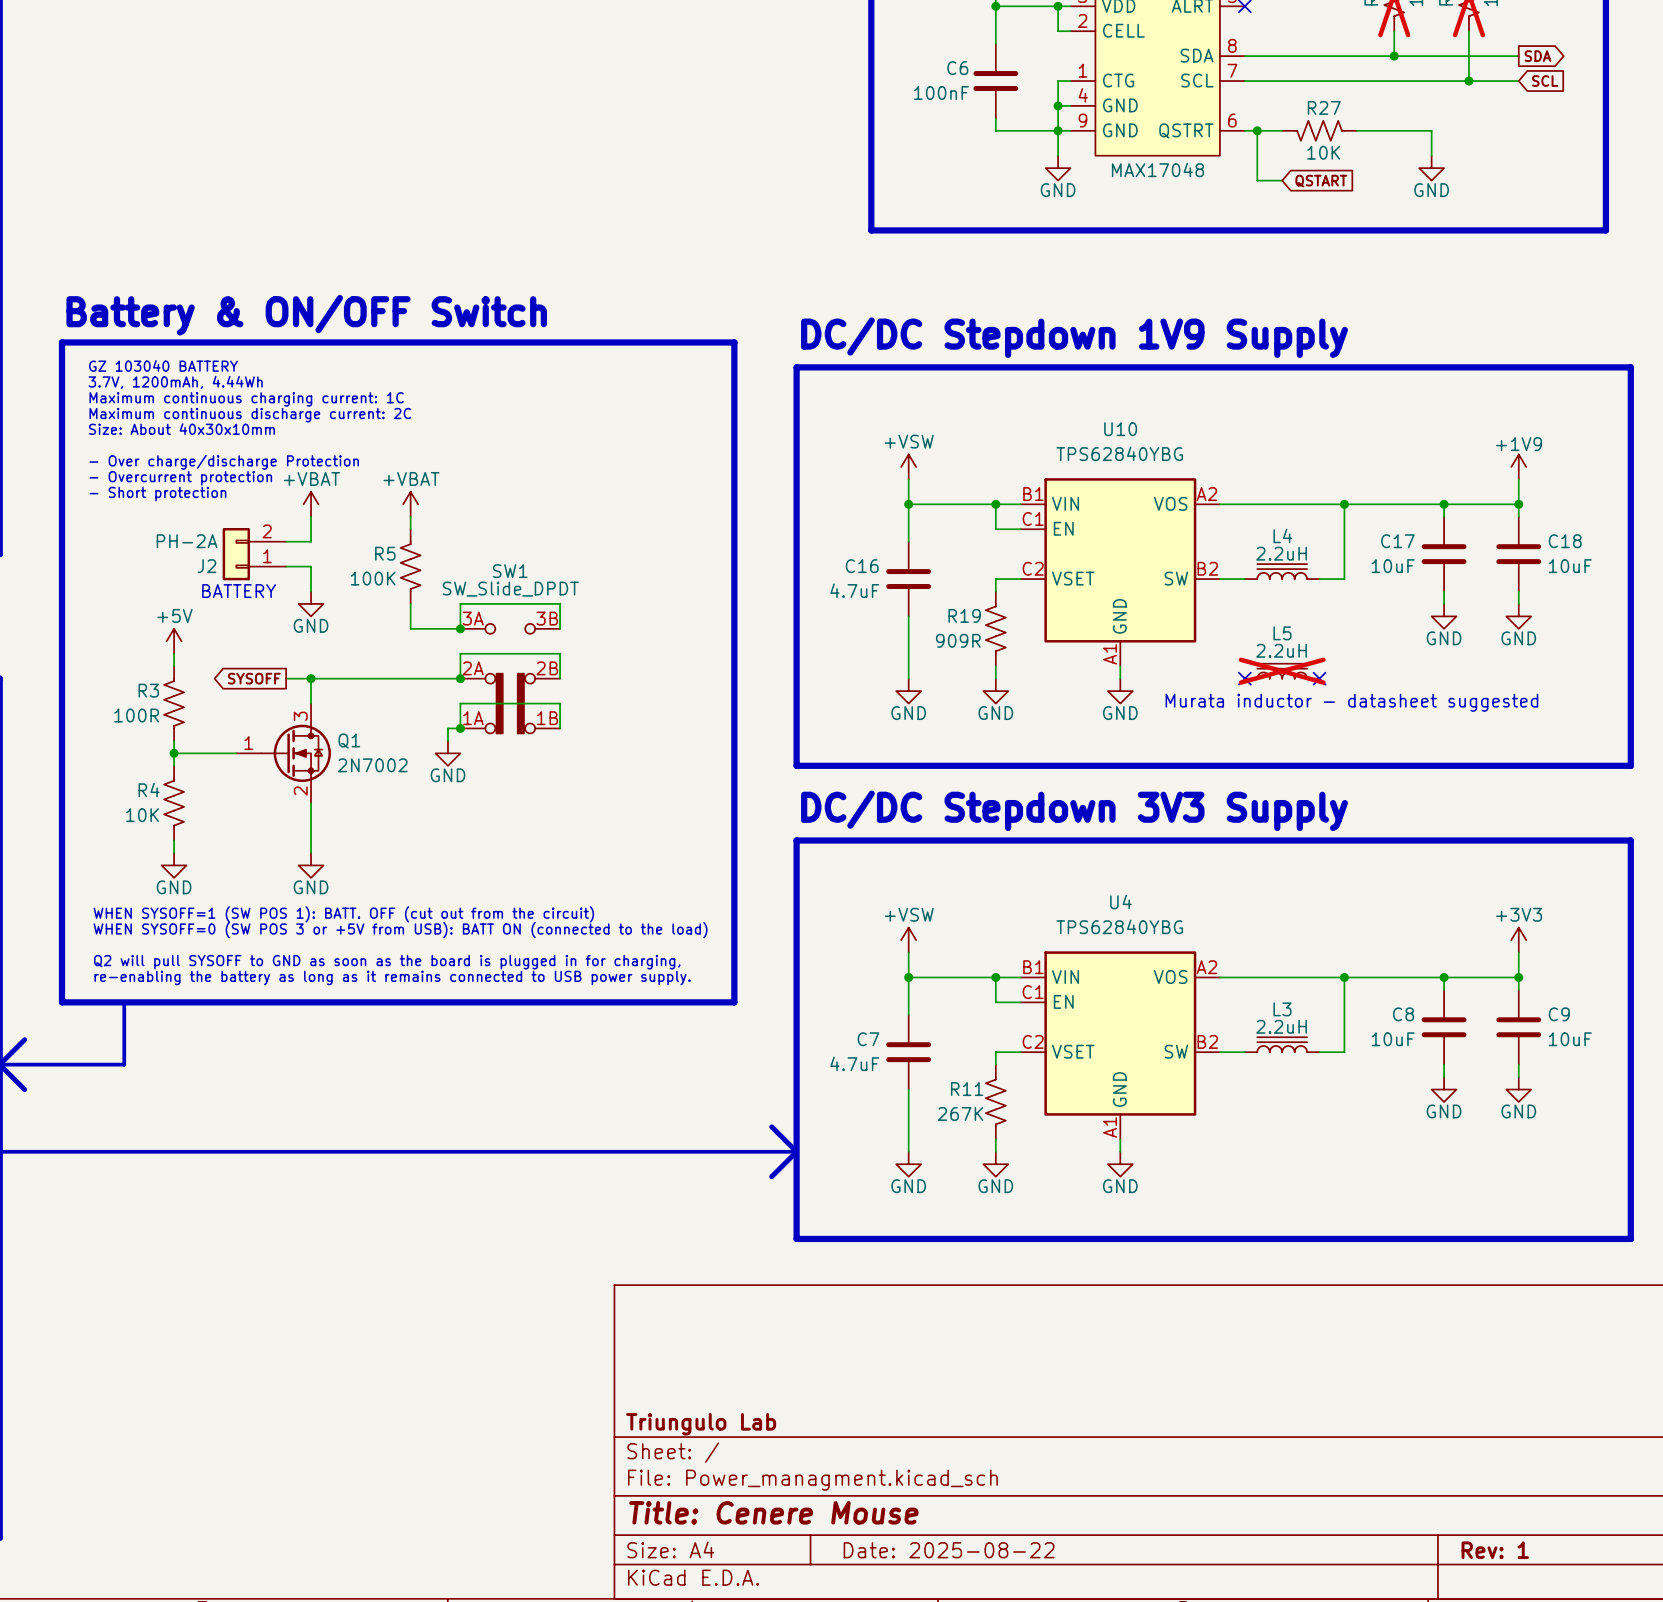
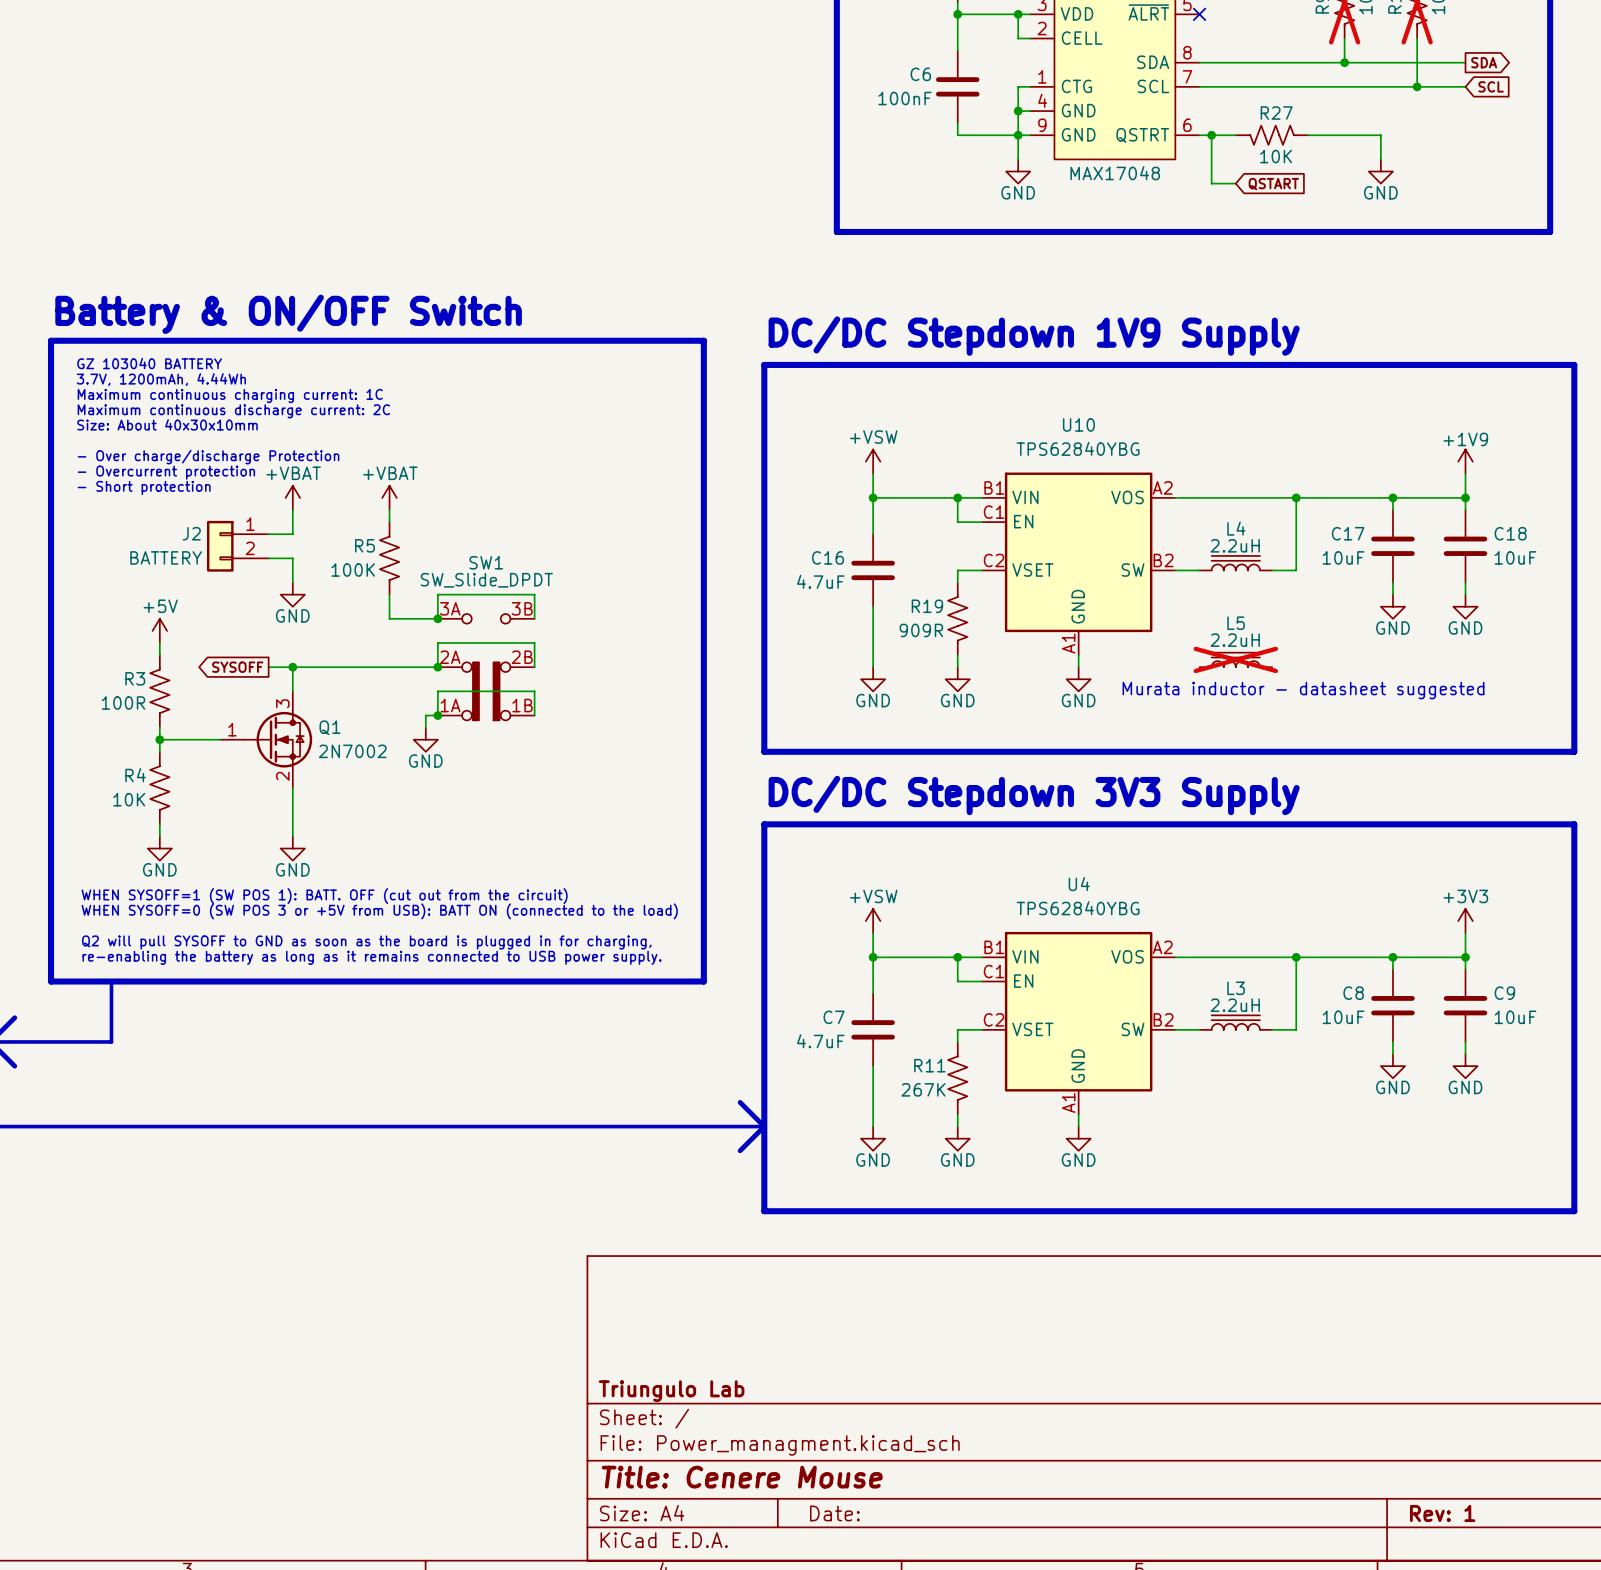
J2 value: PH-2A (187, 541) -> BATTERY (166, 557)
J2 flip: as is (236, 554) -> up-down (220, 546)
text: BATTERY (239, 591) -> none
no-connect mark: (1244, 678) -> none
no-connect mark: (1319, 678) -> none
title block: Date: 2025-08-22 (949, 1550) -> Date: (834, 1513)

